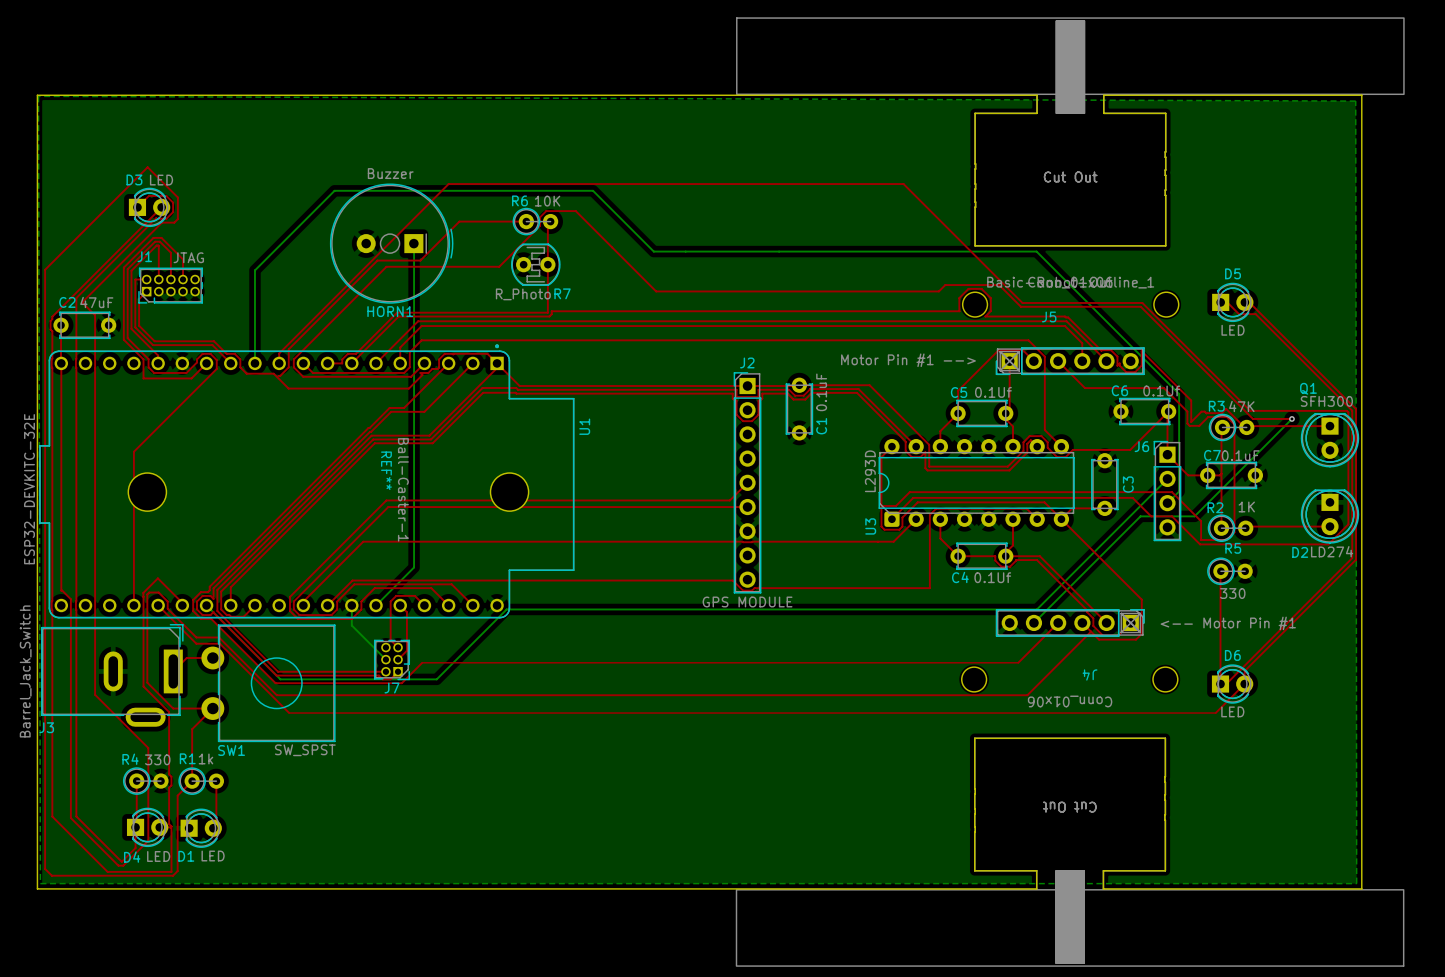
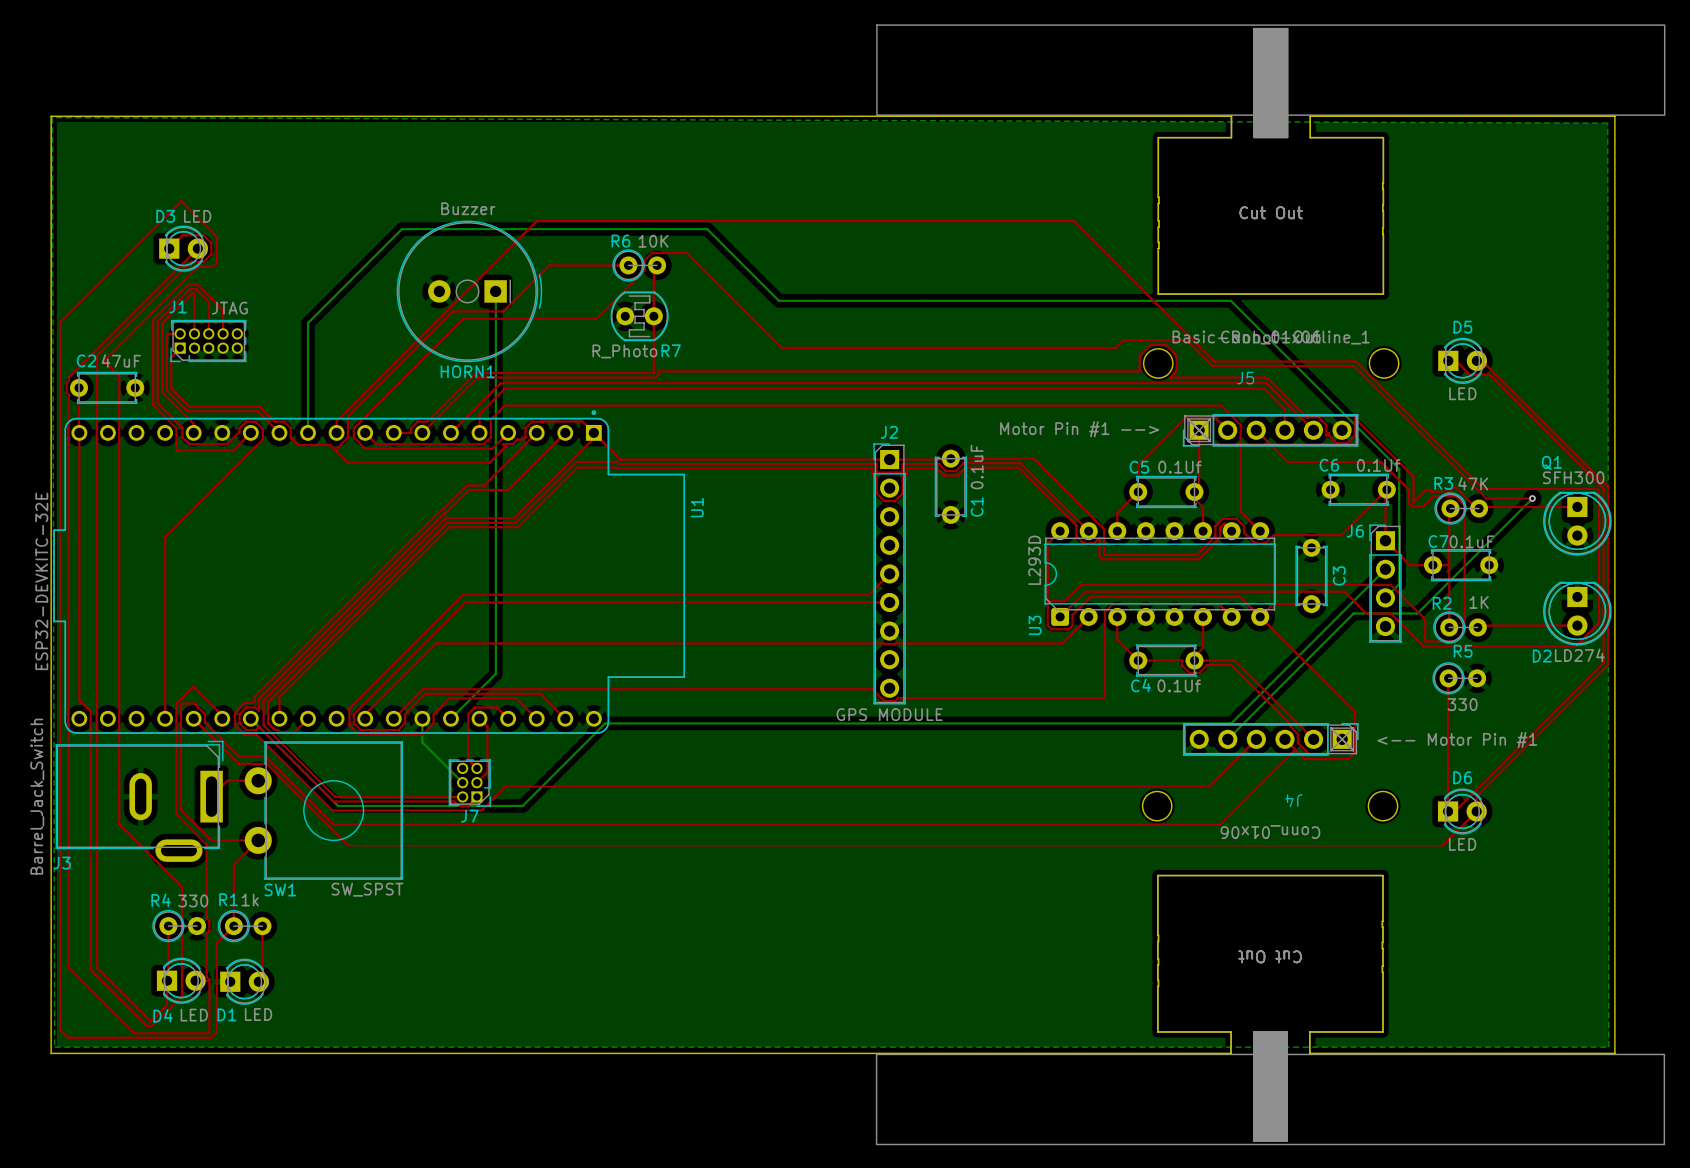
REF**: Ball-Caster-1 (328, 492) -> none

